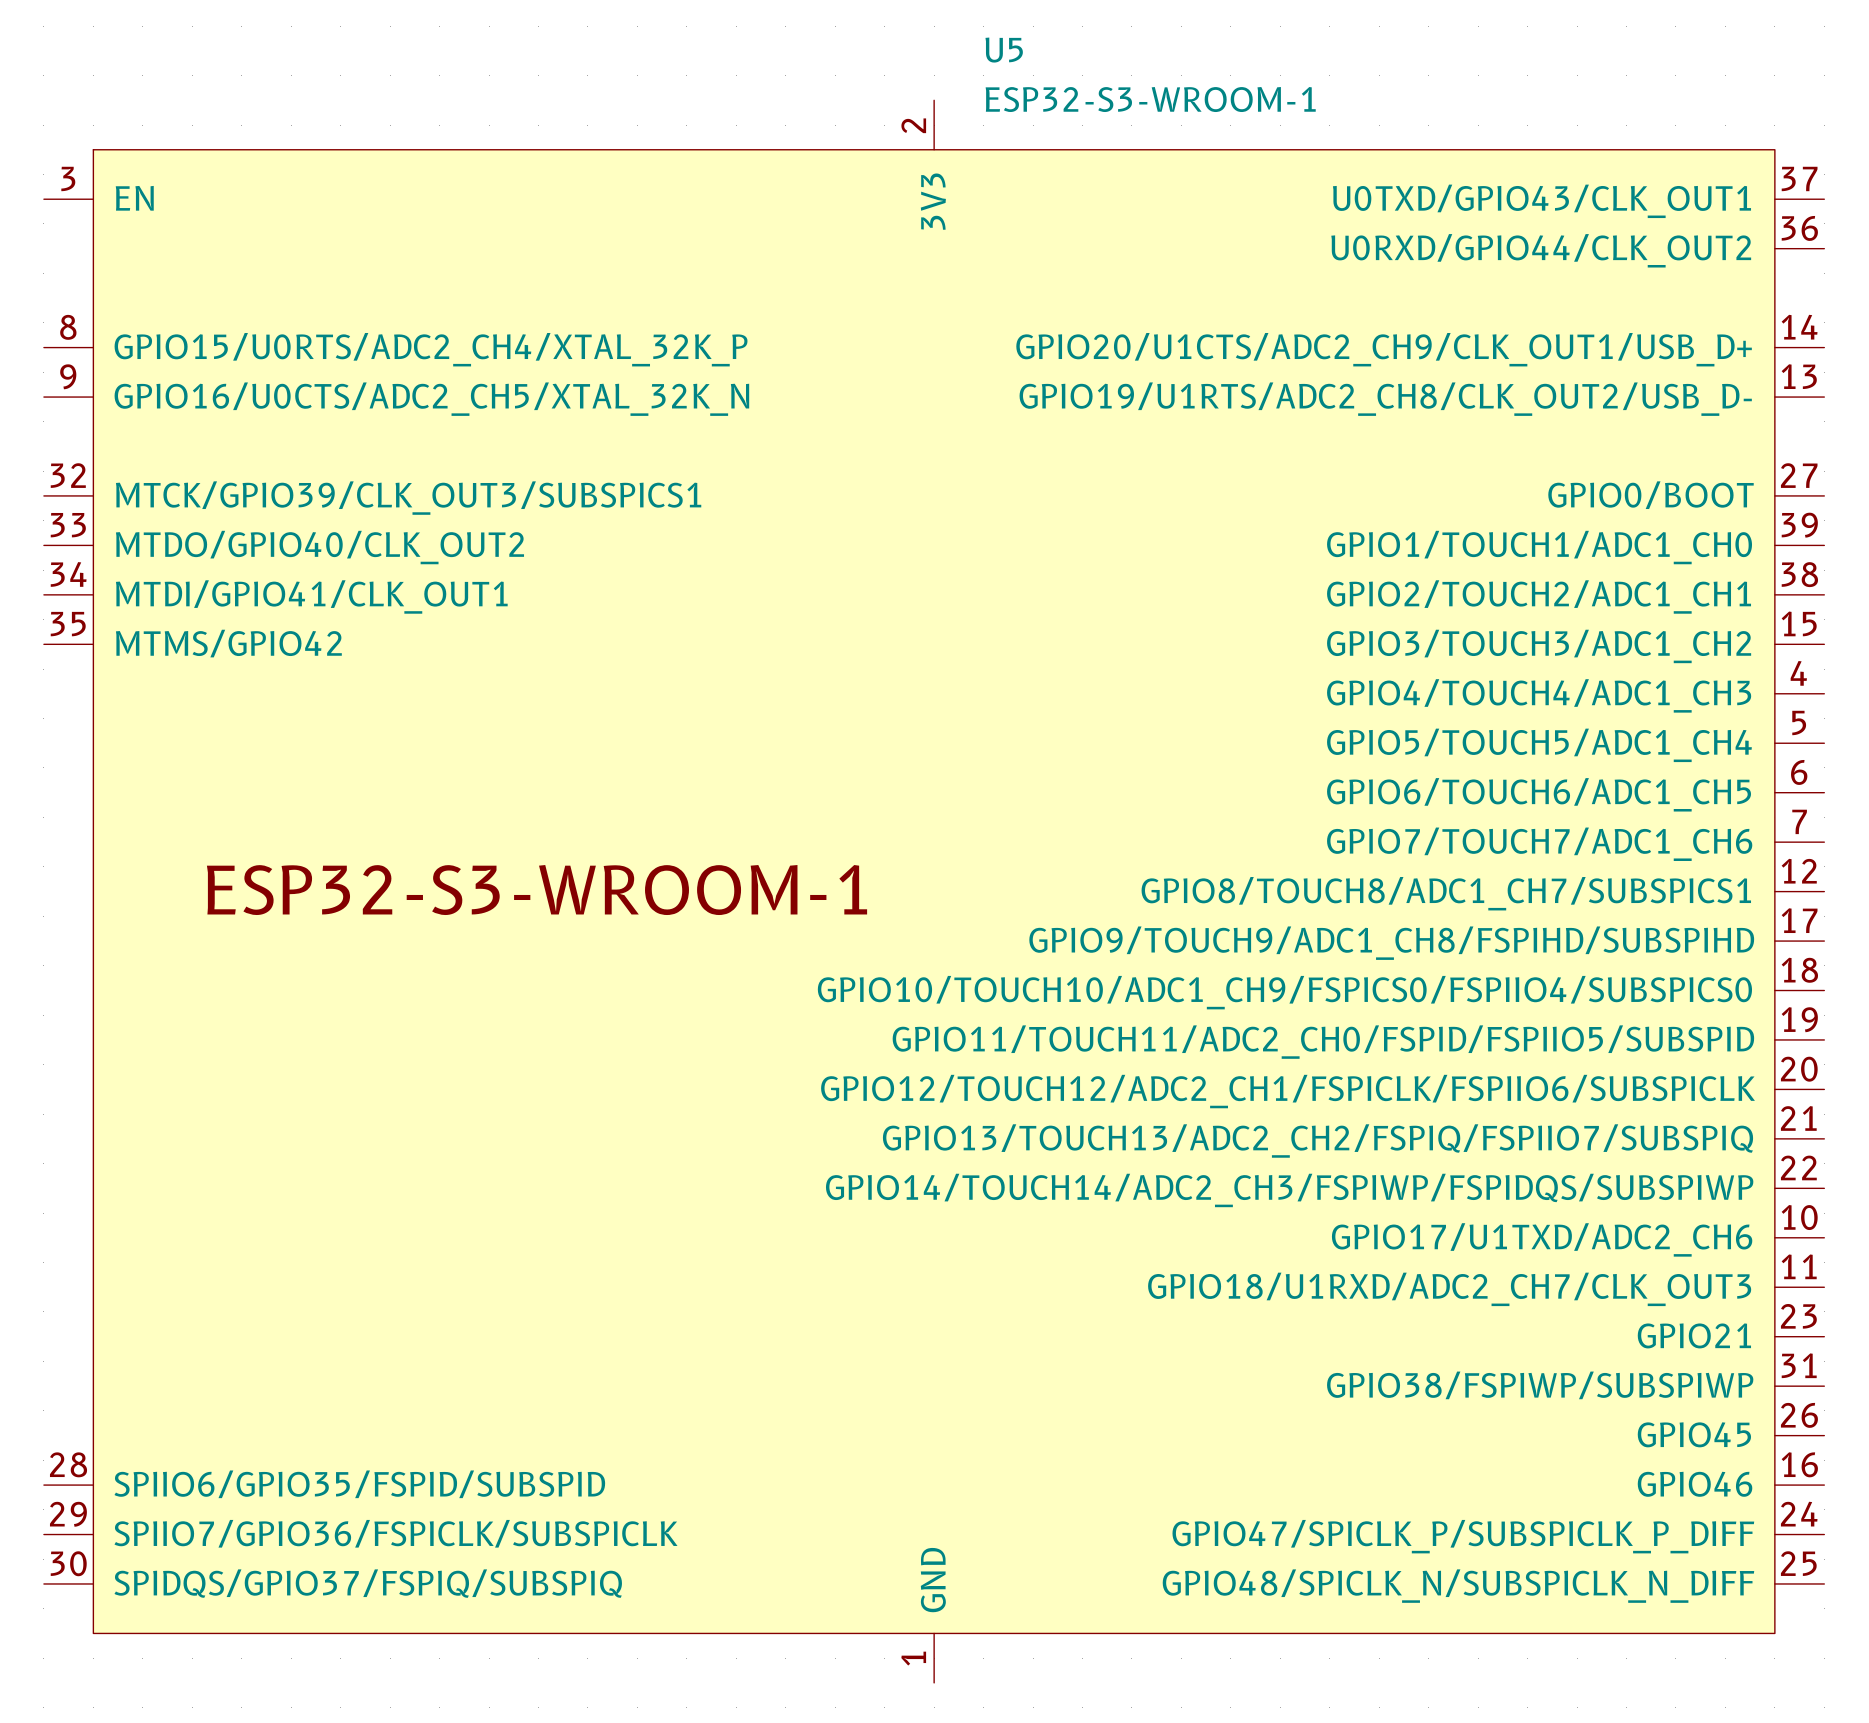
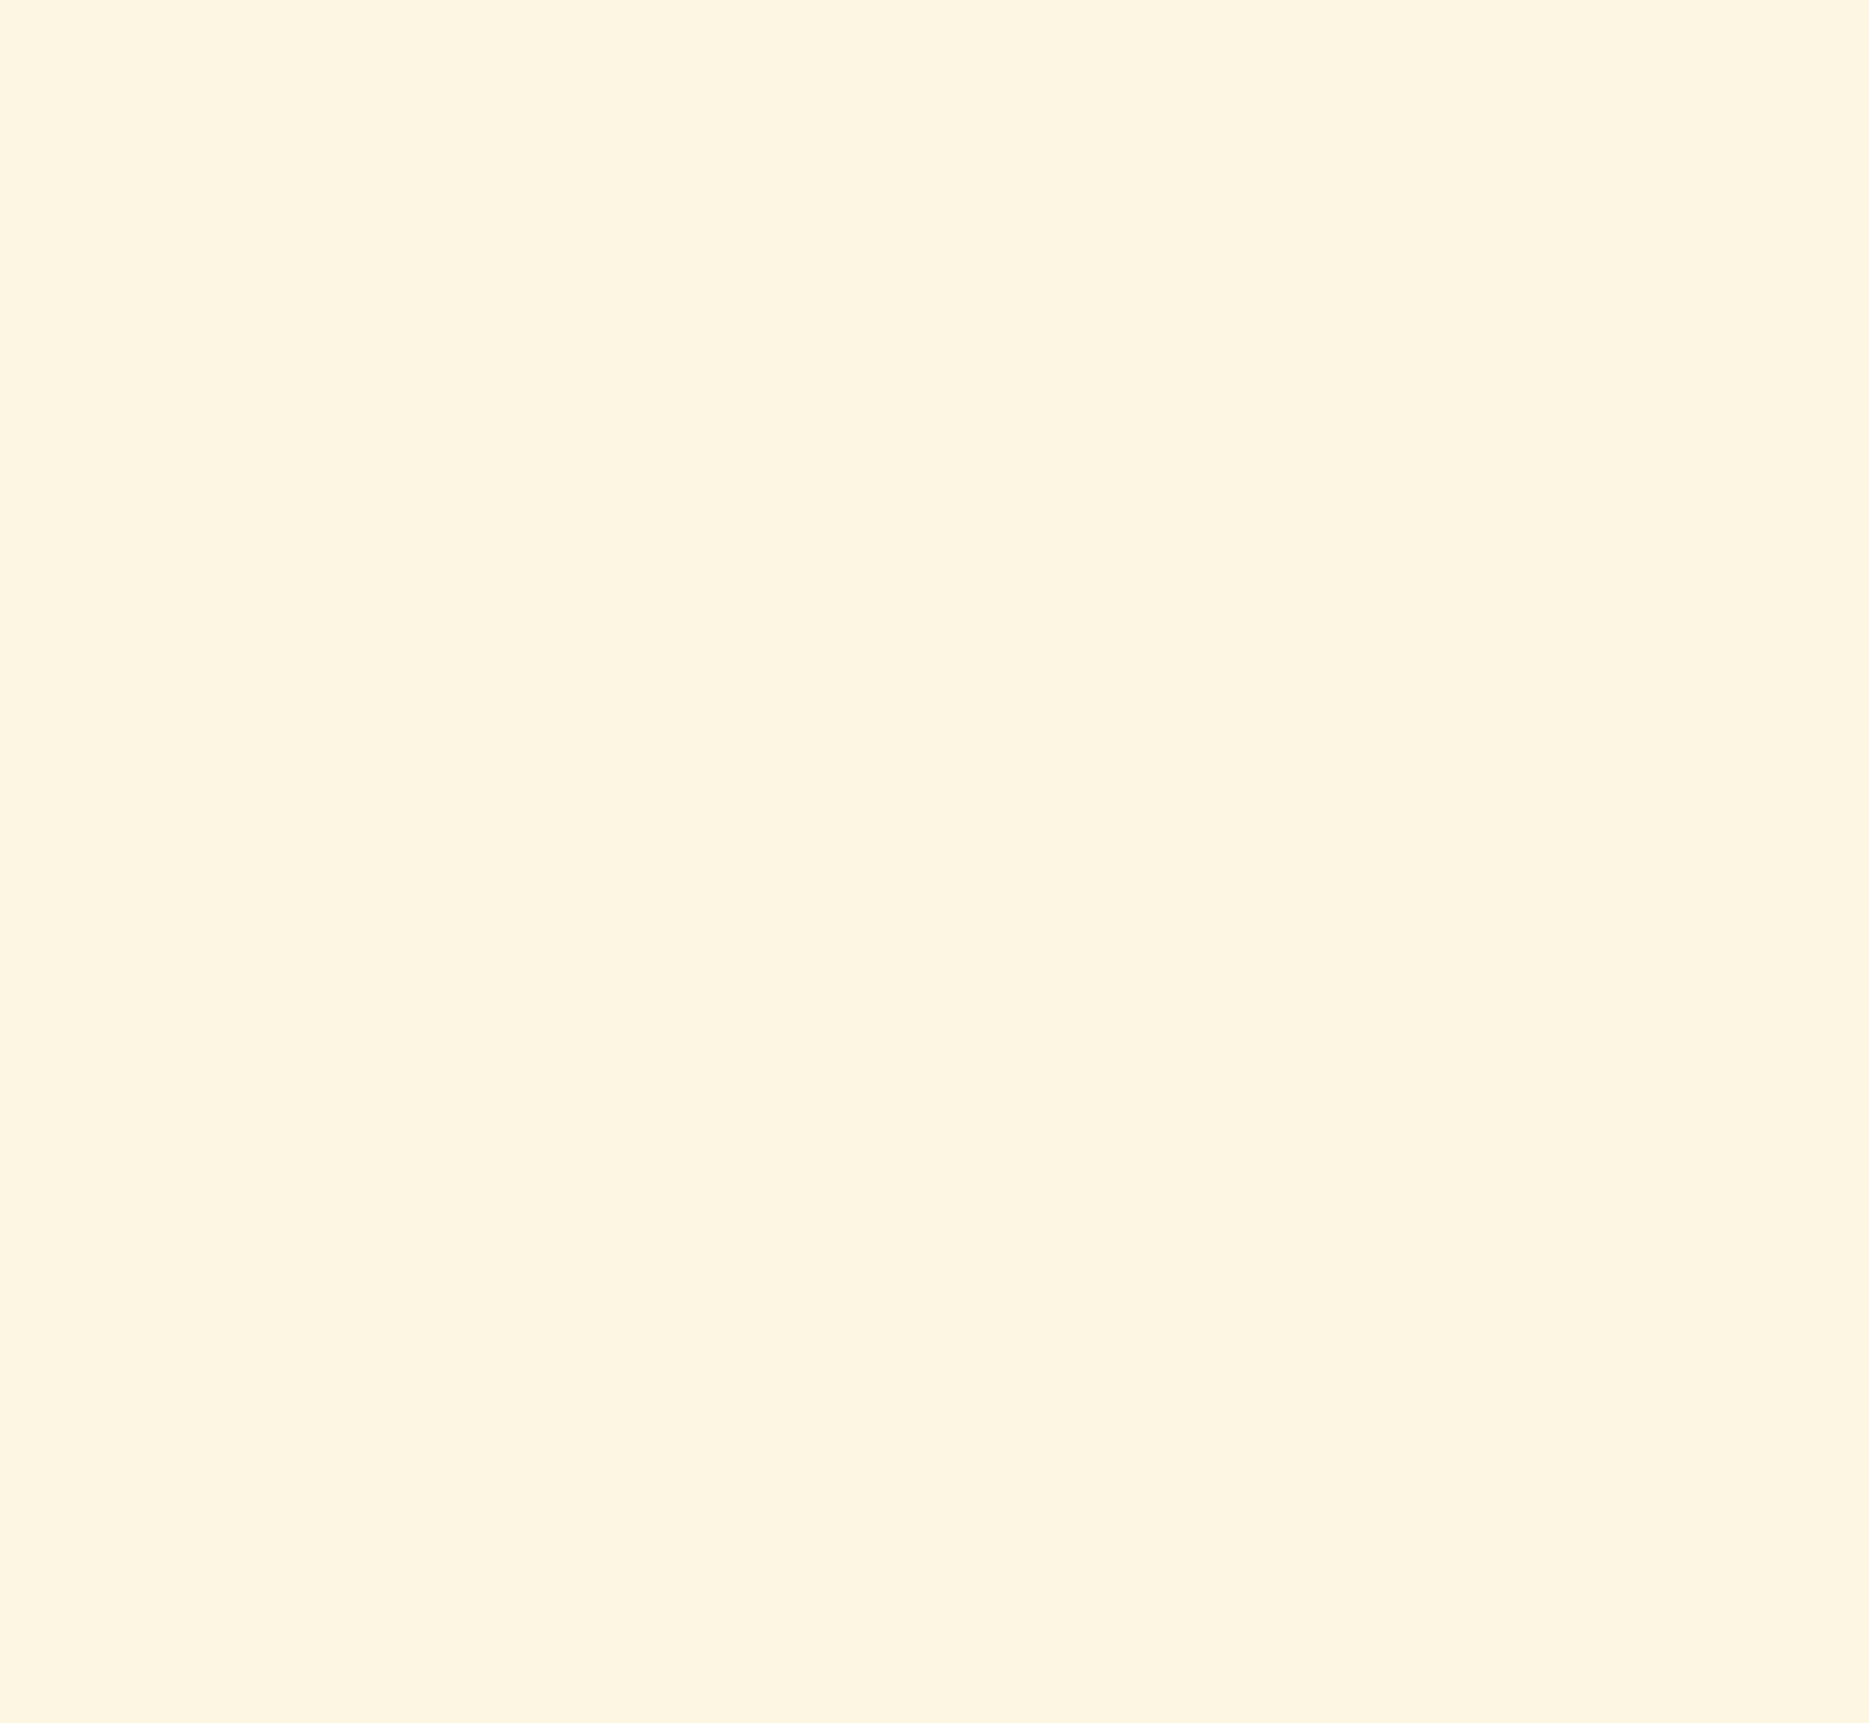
U5: ESP32-S3-WROOM-1 (934, 891) -> none

